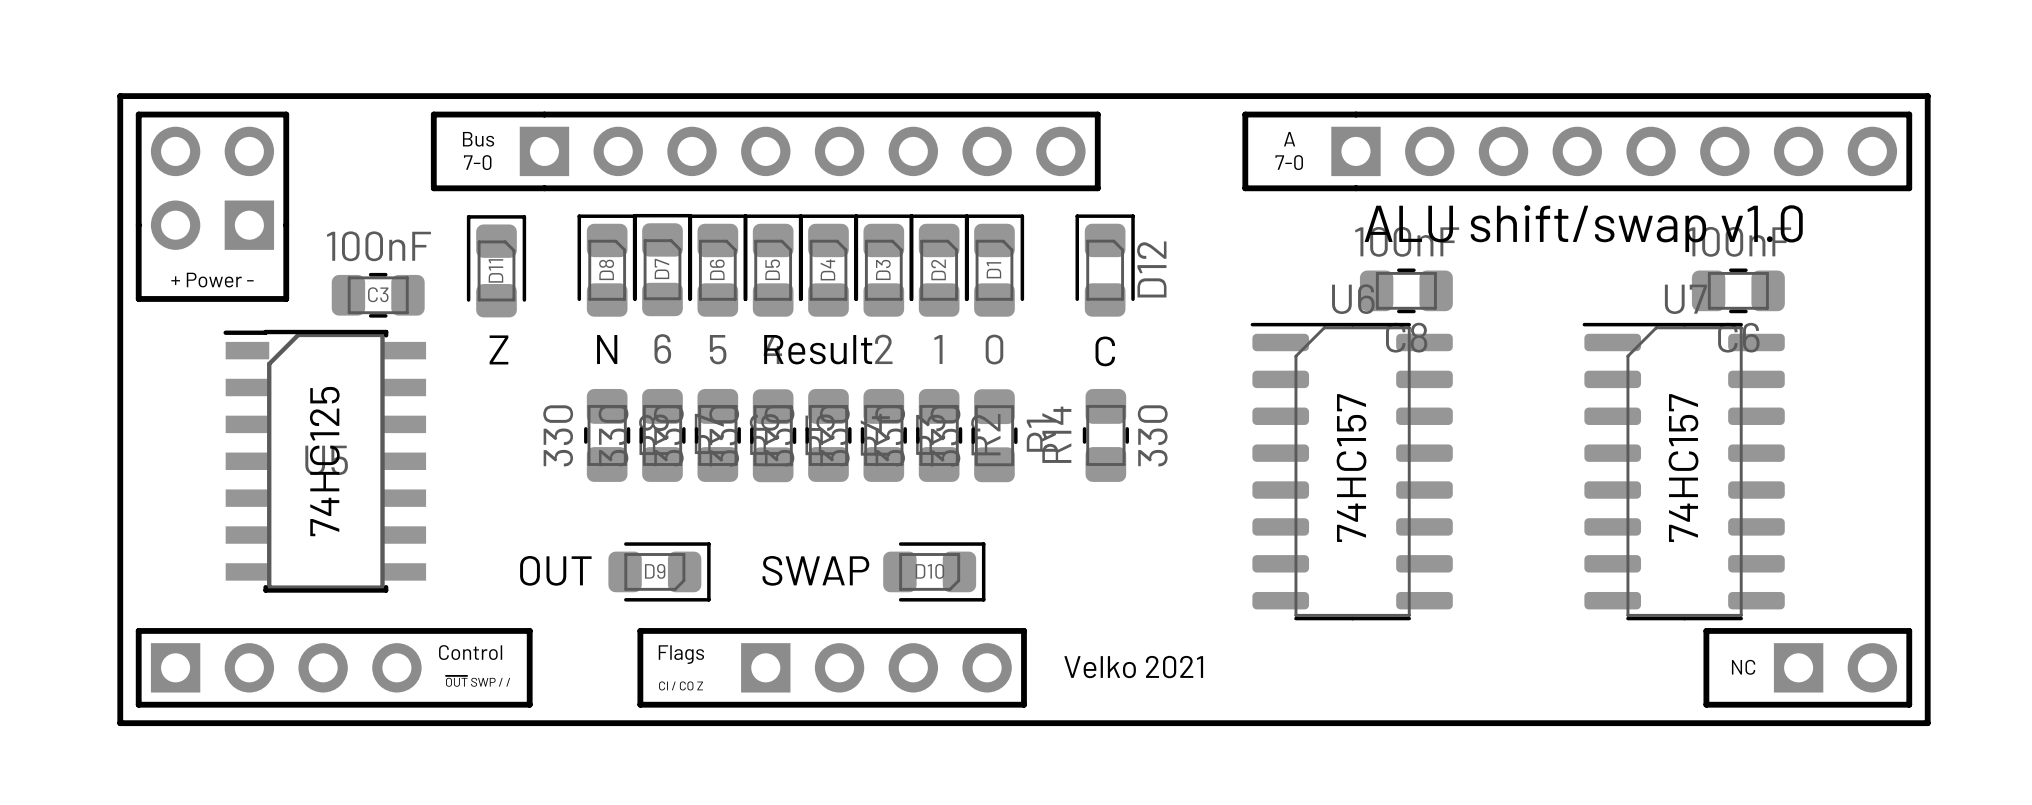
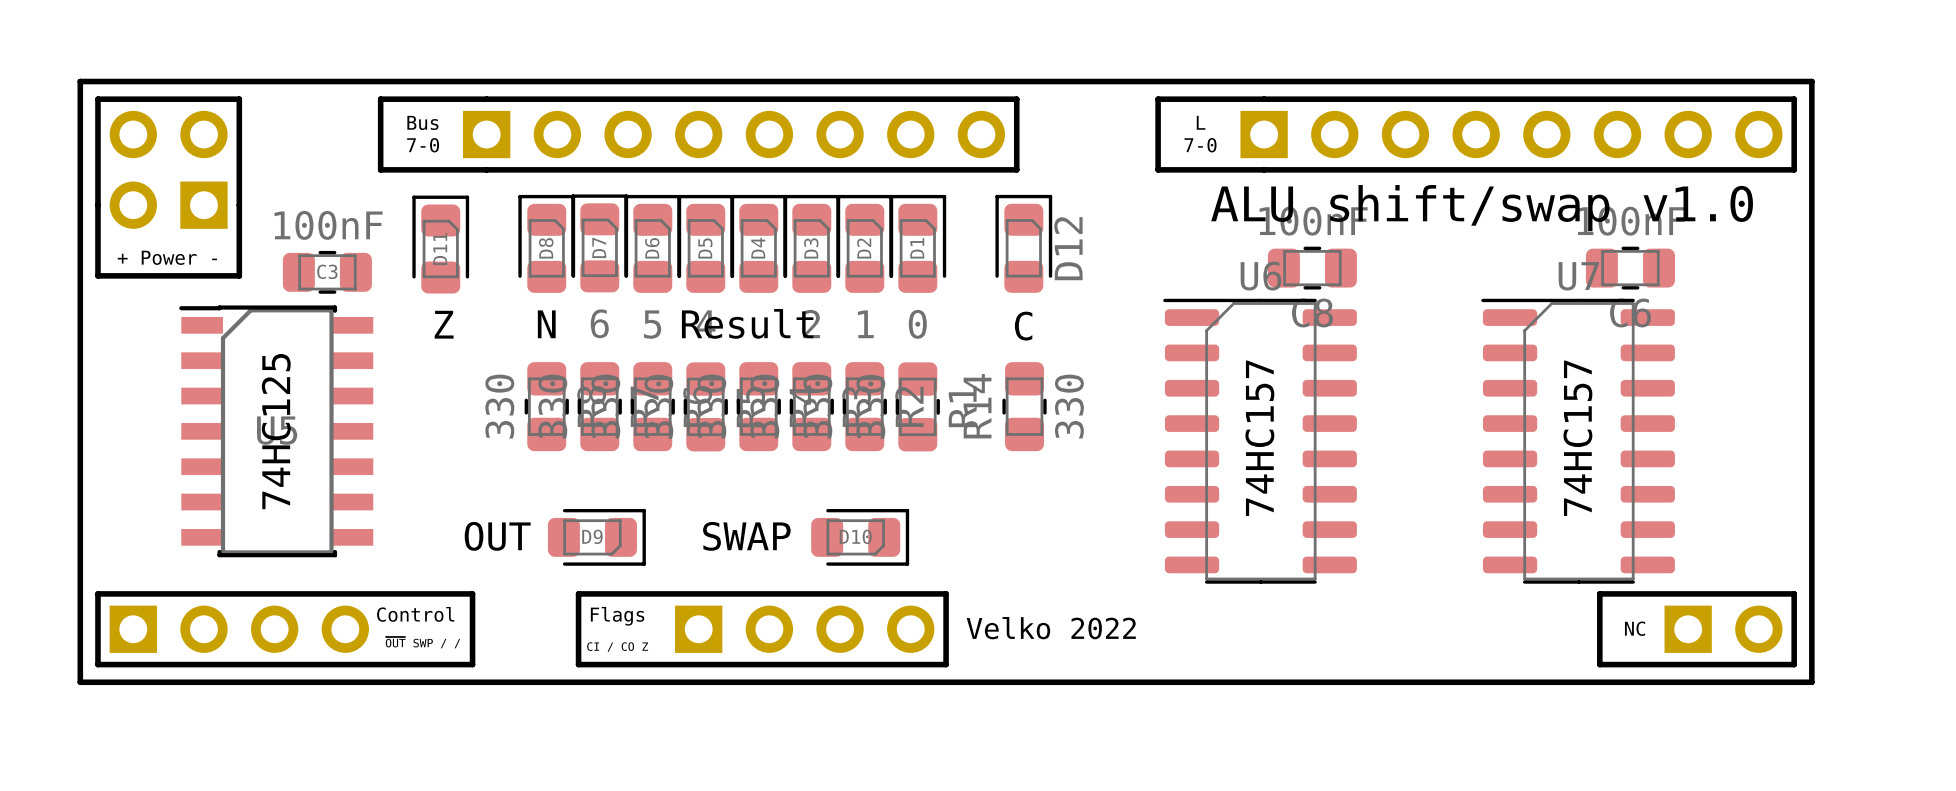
text: A (1289, 139) -> L (1201, 122)
text: Velko 2021 (1133, 667) -> Velko 2022 (1051, 628)

